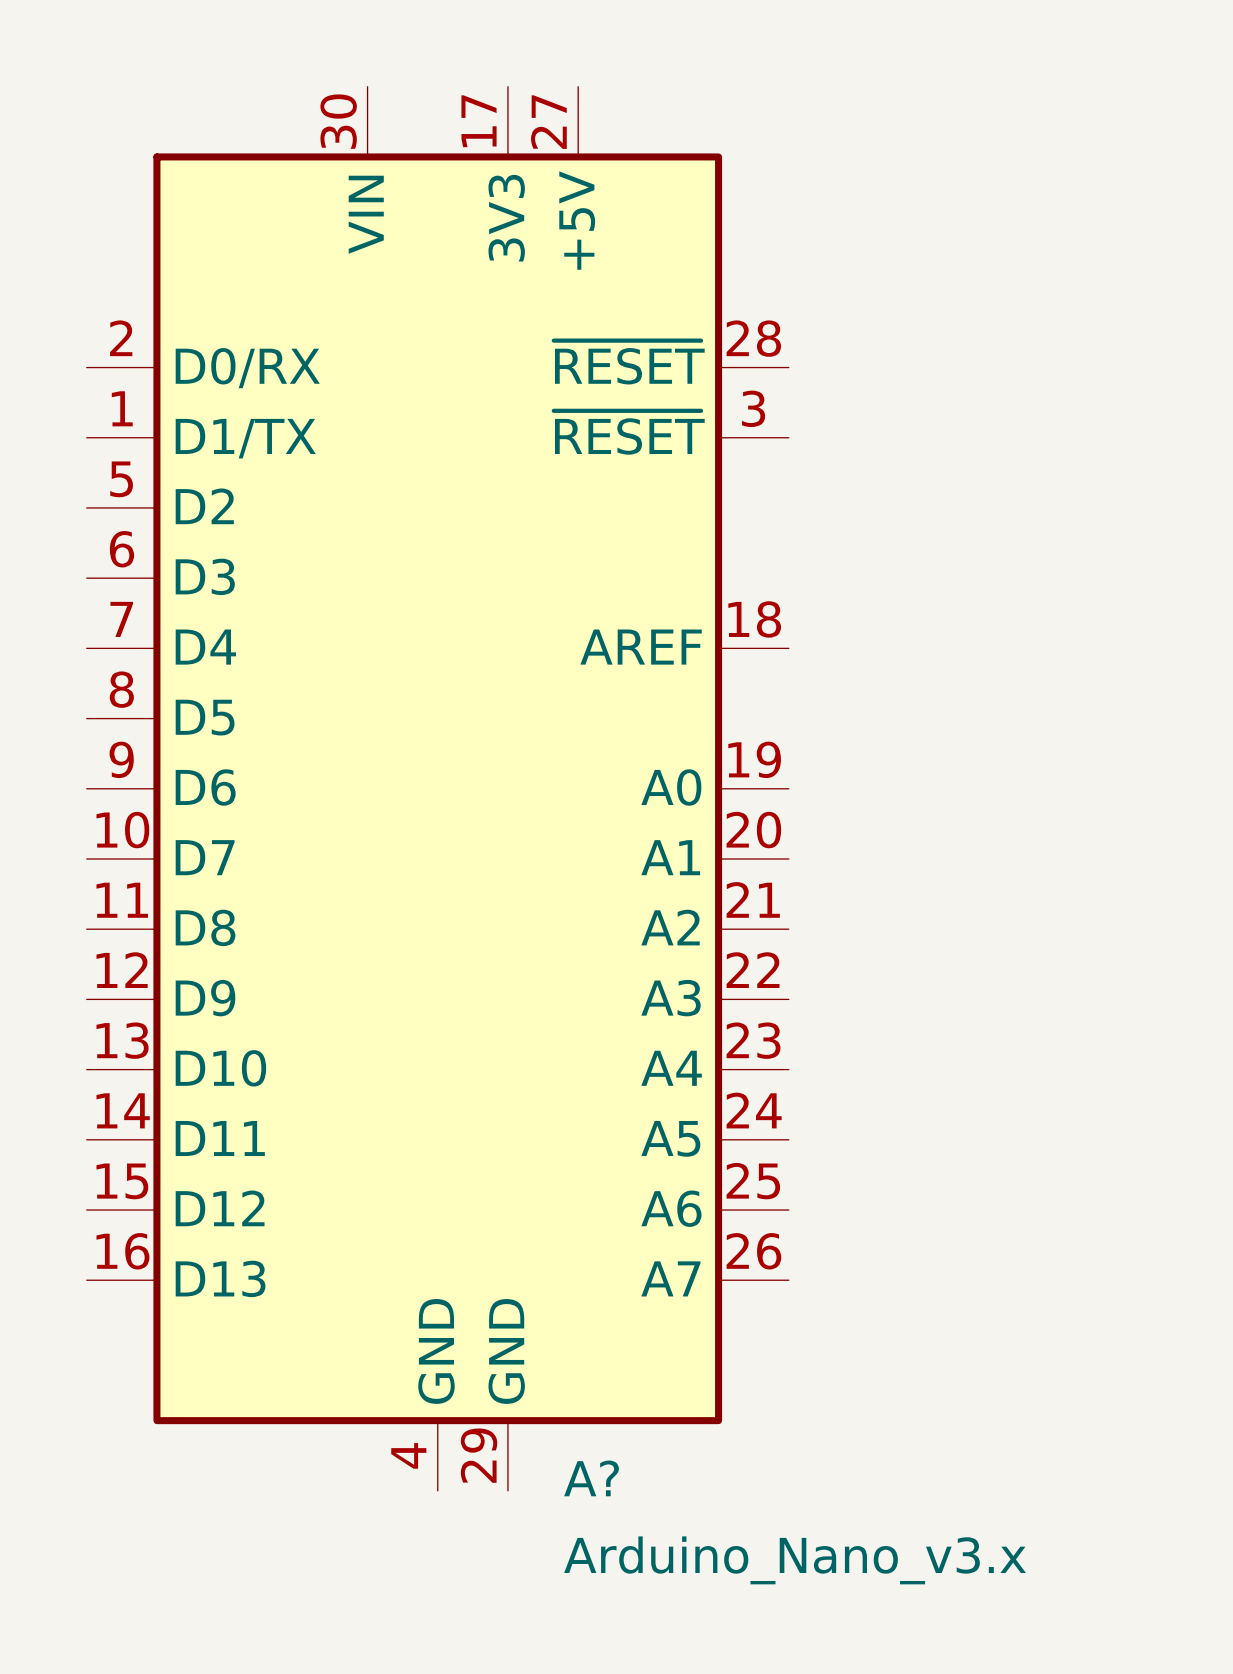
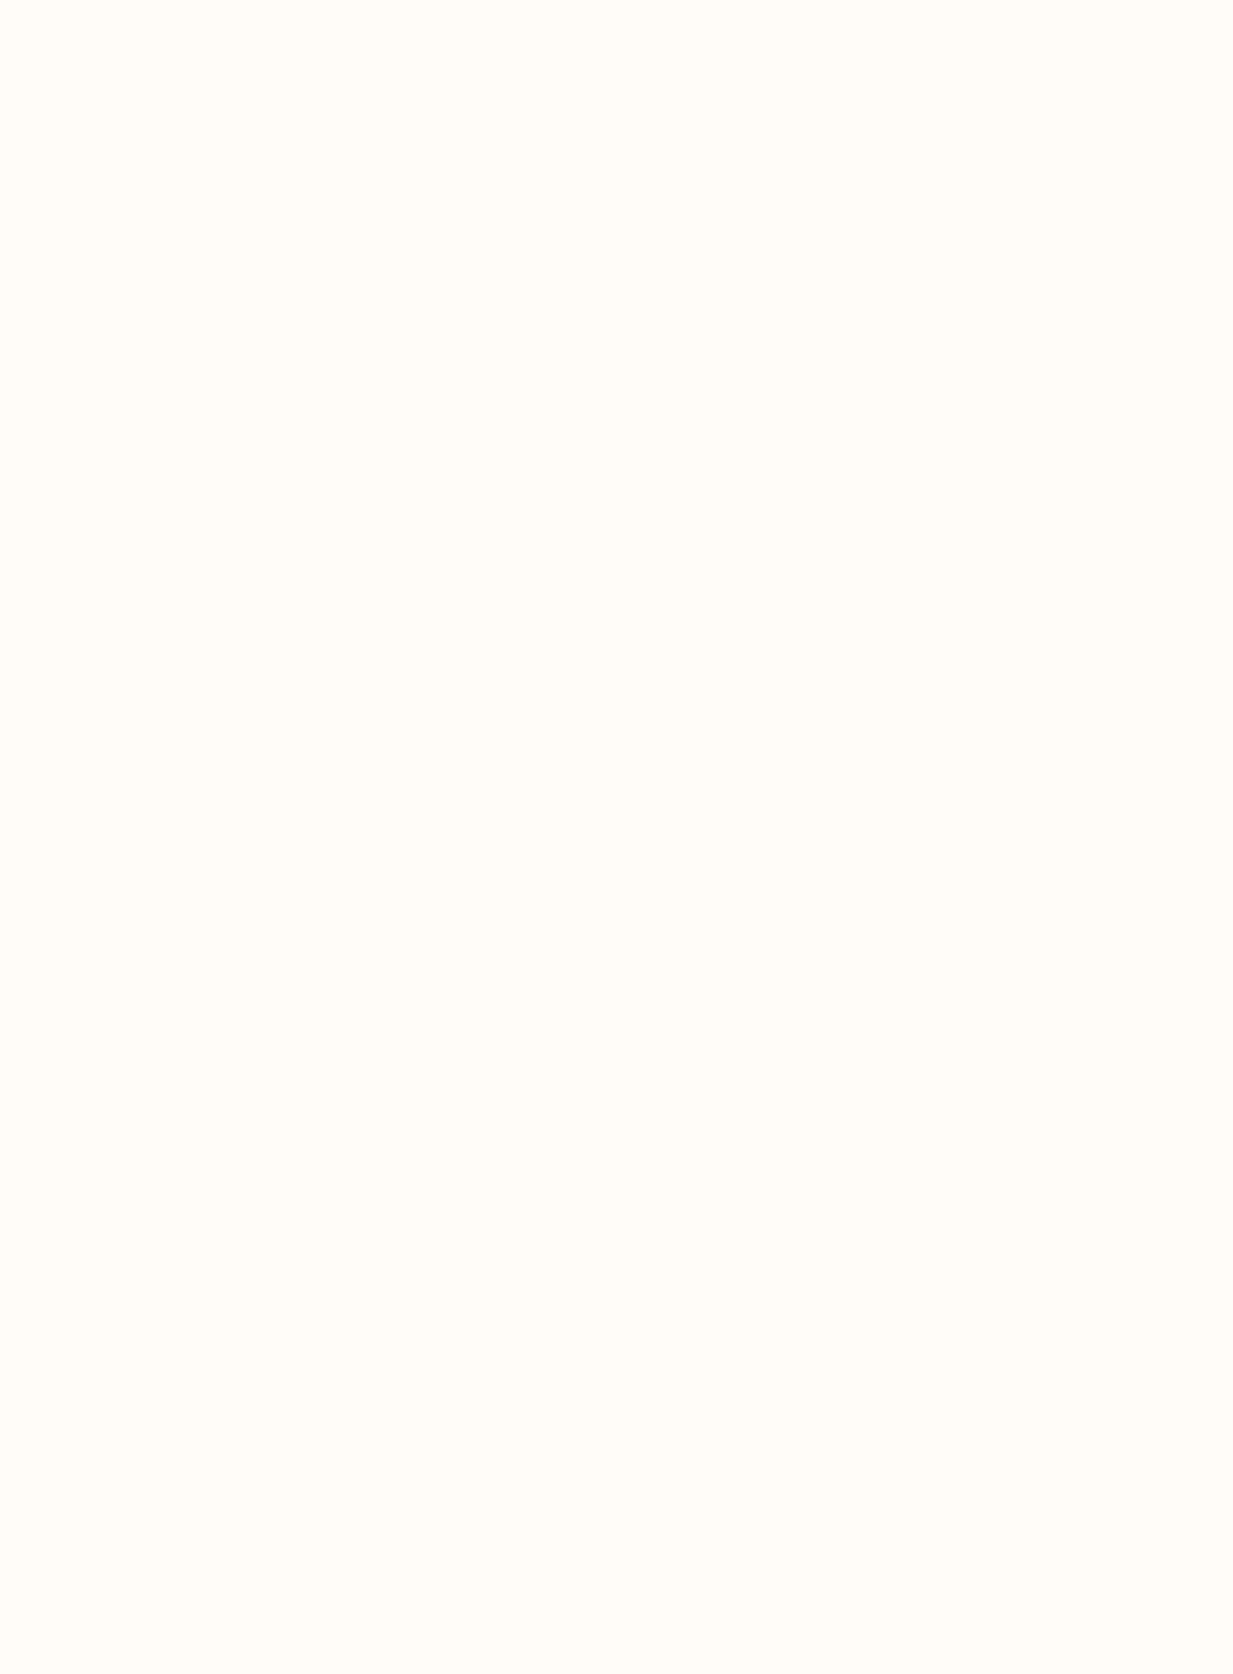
A?: Arduino_Nano_v3.x (437, 788) -> none

